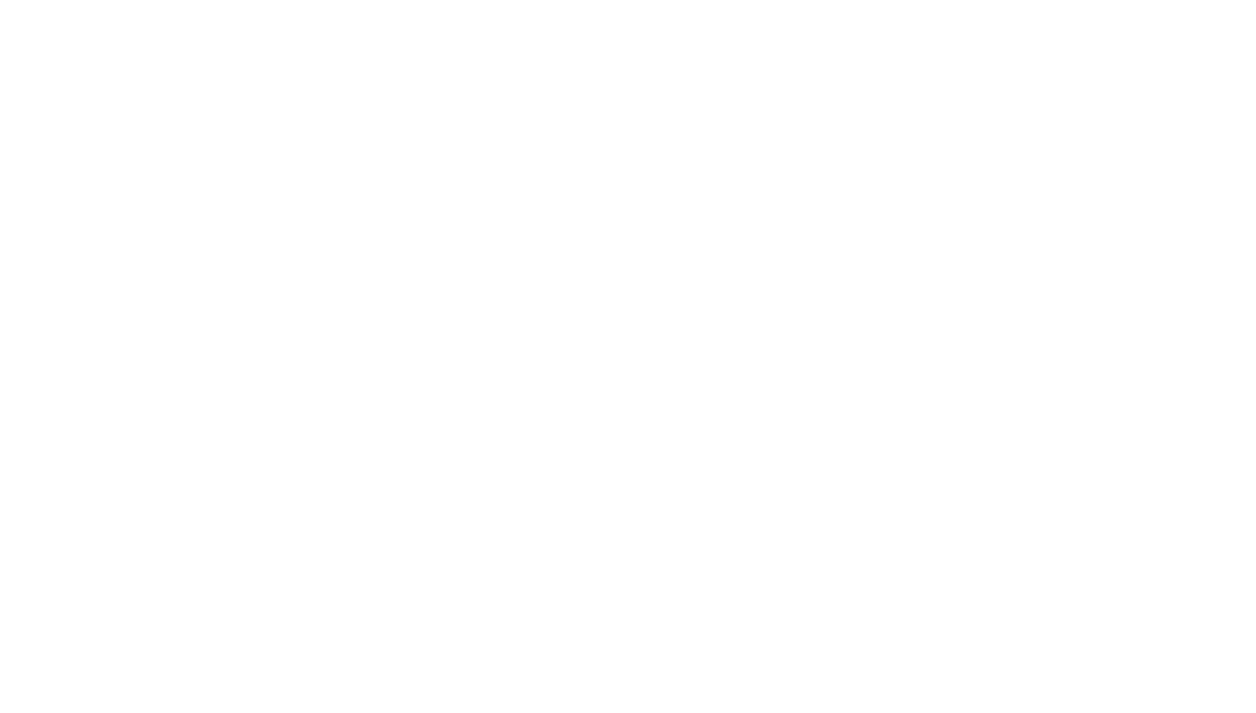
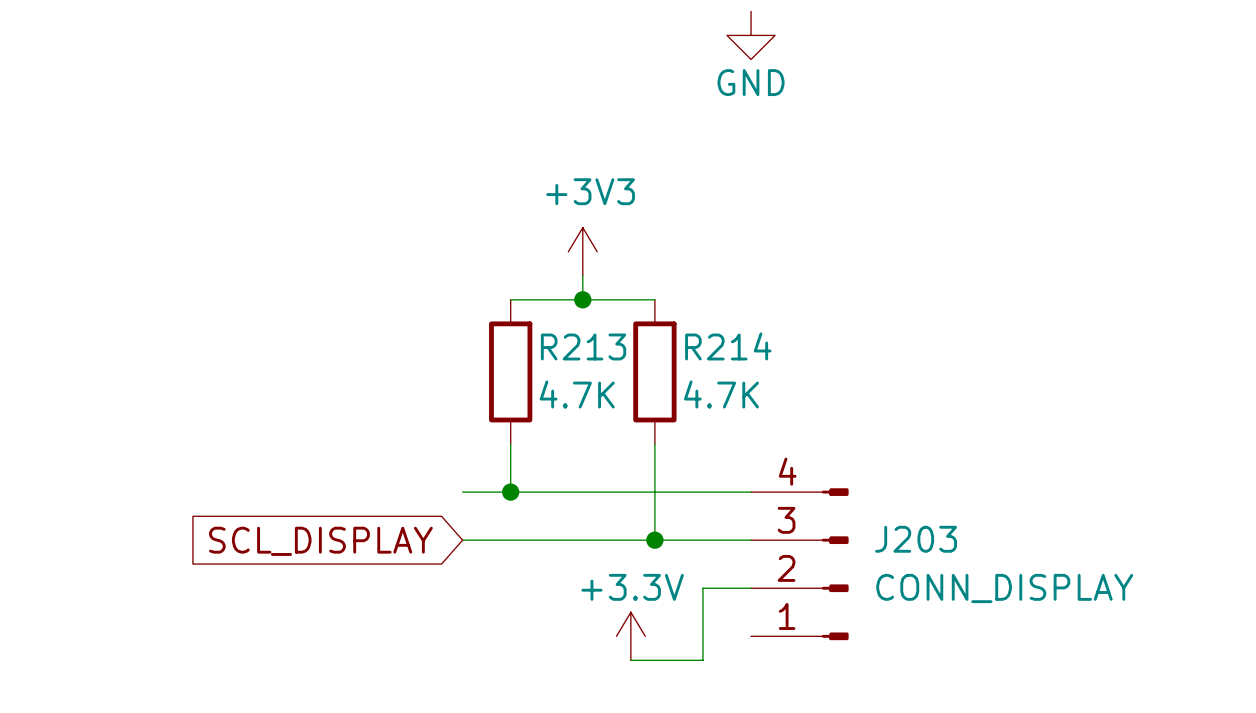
power symbol: none -> GND (751, 35)
power symbol: none -> +3V3 (582, 251)
wire: none -> (582, 275) (582, 299)
wire: none -> (510, 299) (654, 299)
junction: none -> (582, 299)
R213: none -> 4.7K (510, 371)
R214: none -> 4.7K (654, 371)
wire: none -> (510, 444) (510, 492)
wire: none -> (654, 444) (654, 540)
wire: none -> (462, 492) (751, 492)
junction: none -> (510, 492)
wire: none -> (462, 540) (751, 540)
junction: none -> (654, 540)
global label: none -> SCL_DISPLAY (320, 541)
J203: none -> CONN_DISPLAY (799, 564)
wire: none -> (751, 588) (702, 588) (702, 660) (630, 660)
power symbol: none -> +3.3V (630, 636)

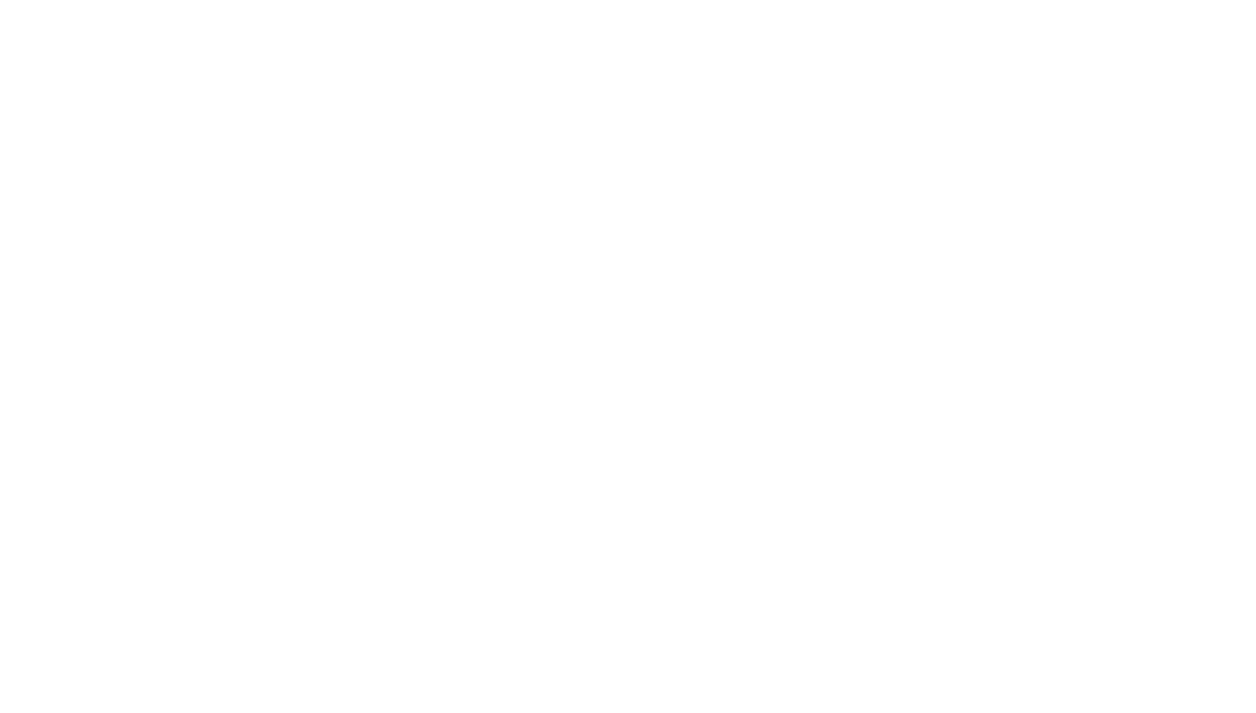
power symbol: GND (751, 35) -> none
power symbol: +3V3 (582, 251) -> none
wire: (582, 275) (582, 299) -> none
wire: (510, 299) (654, 299) -> none
junction: (582, 299) -> none
R213: 4.7K (510, 371) -> none
R214: 4.7K (654, 371) -> none
wire: (510, 444) (510, 492) -> none
wire: (654, 444) (654, 540) -> none
wire: (462, 492) (751, 492) -> none
junction: (510, 492) -> none
wire: (462, 540) (751, 540) -> none
junction: (654, 540) -> none
global label: SCL_DISPLAY (320, 541) -> none
J203: CONN_DISPLAY (799, 564) -> none
wire: (751, 588) (702, 588) (702, 660) (630, 660) -> none
power symbol: +3.3V (630, 636) -> none

